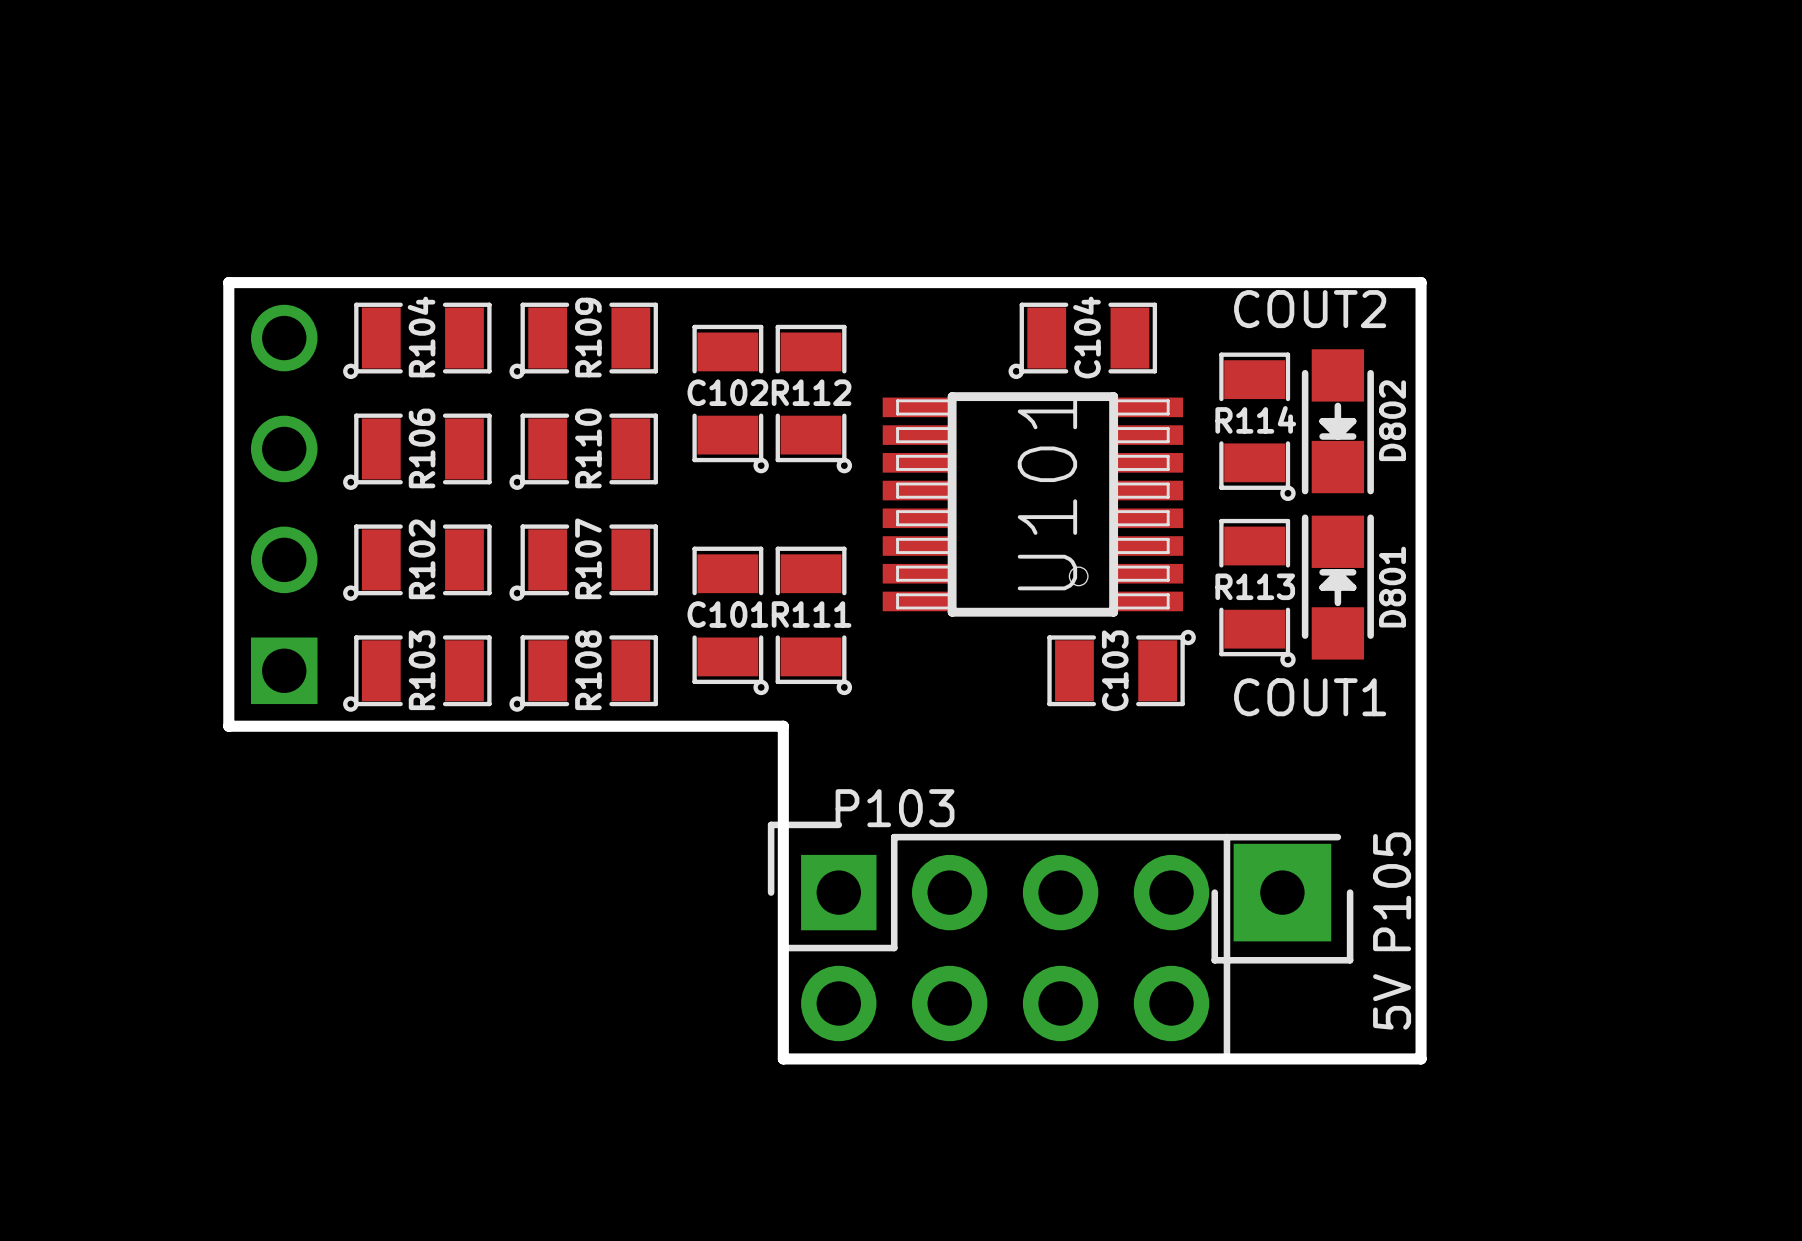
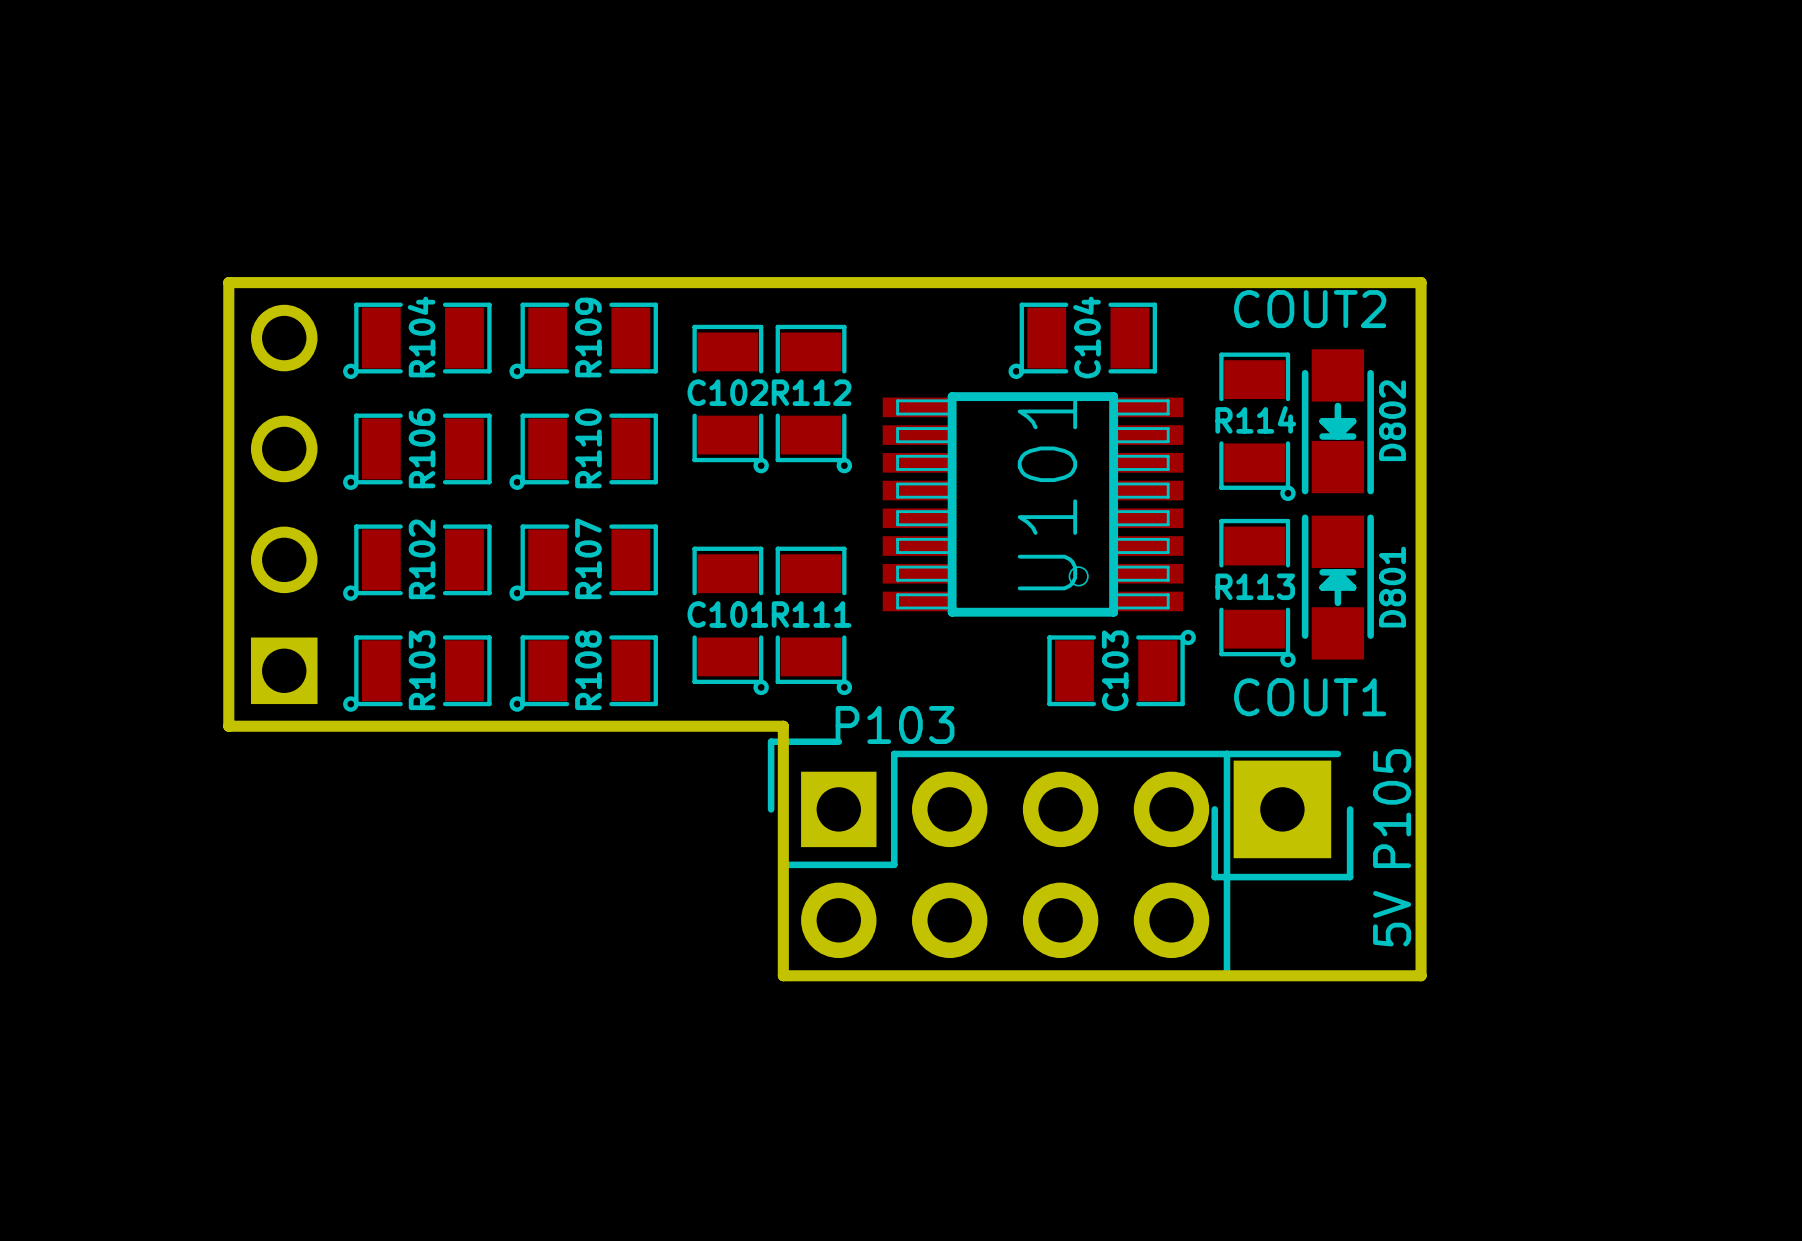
P105 position: (1282, 898) -> (1282, 815)
P103 position: (999, 941) -> (999, 858)
board edge: (783, 975) (783, 1058) (1421, 1058) (1421, 975) -> (783, 975) (1421, 975)
text position: 5V (1392, 1001) -> 5V (1392, 918)

